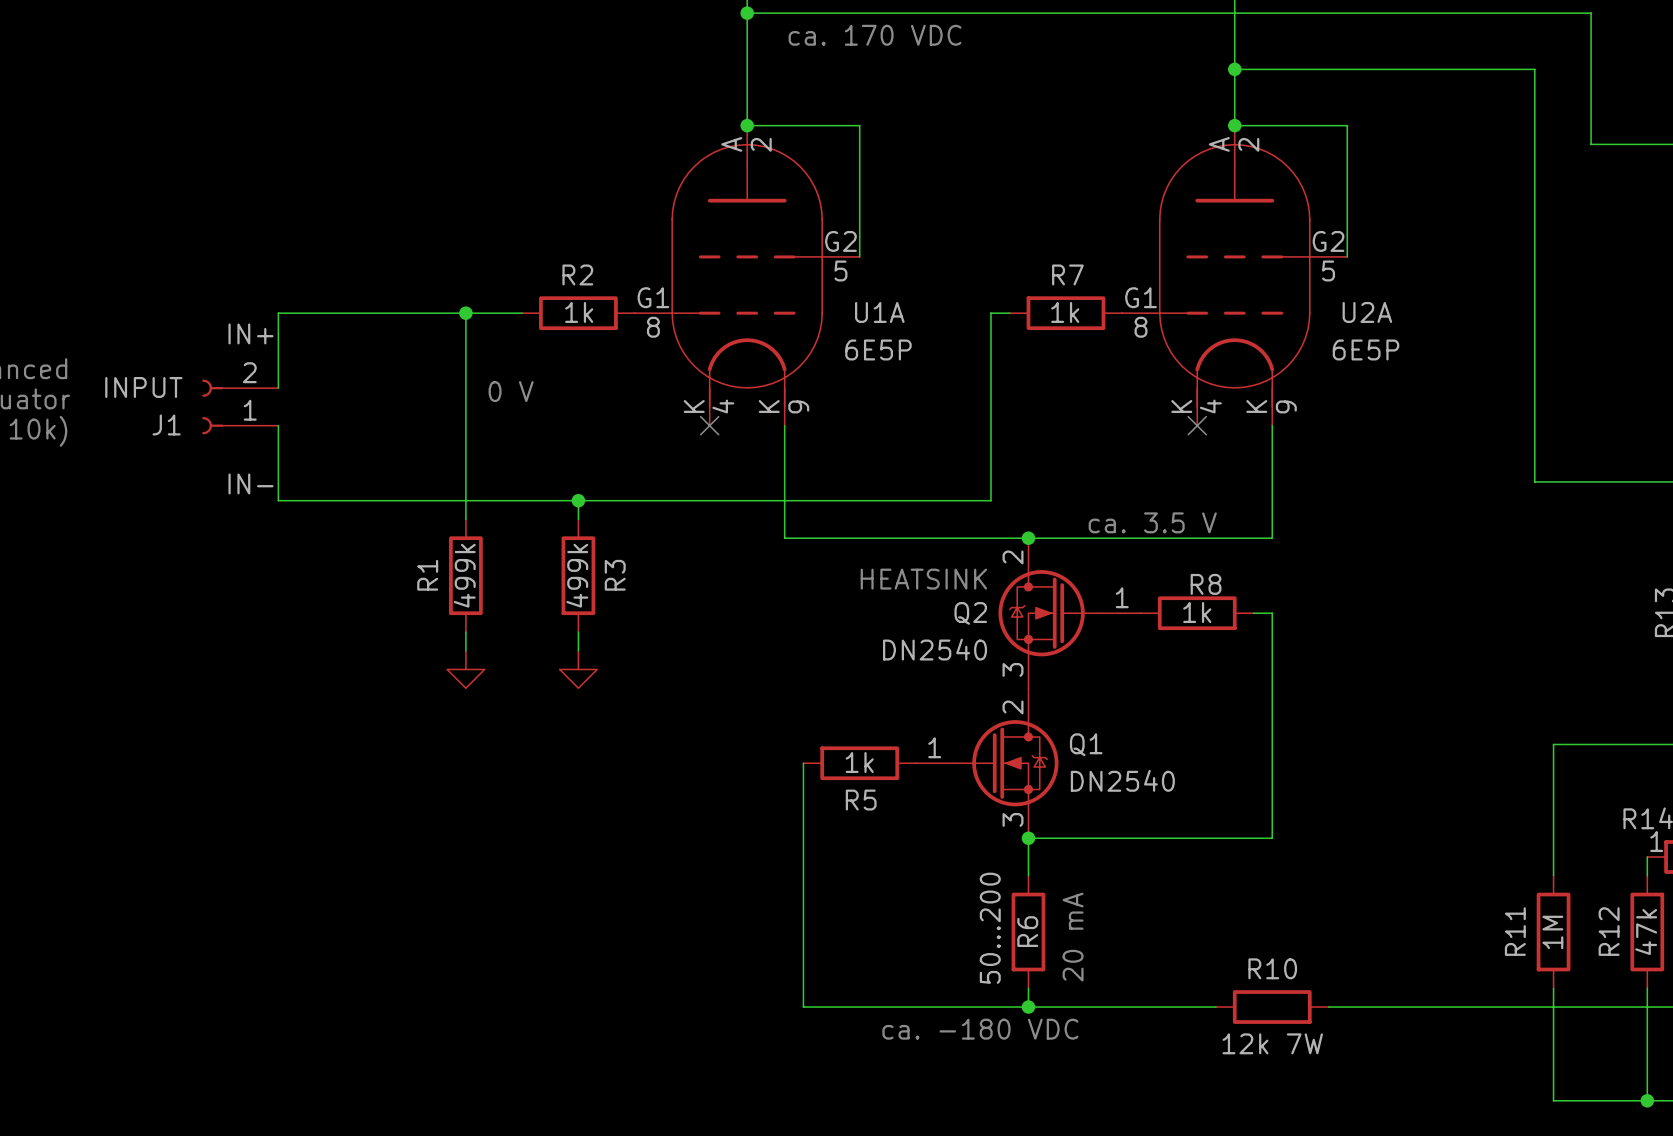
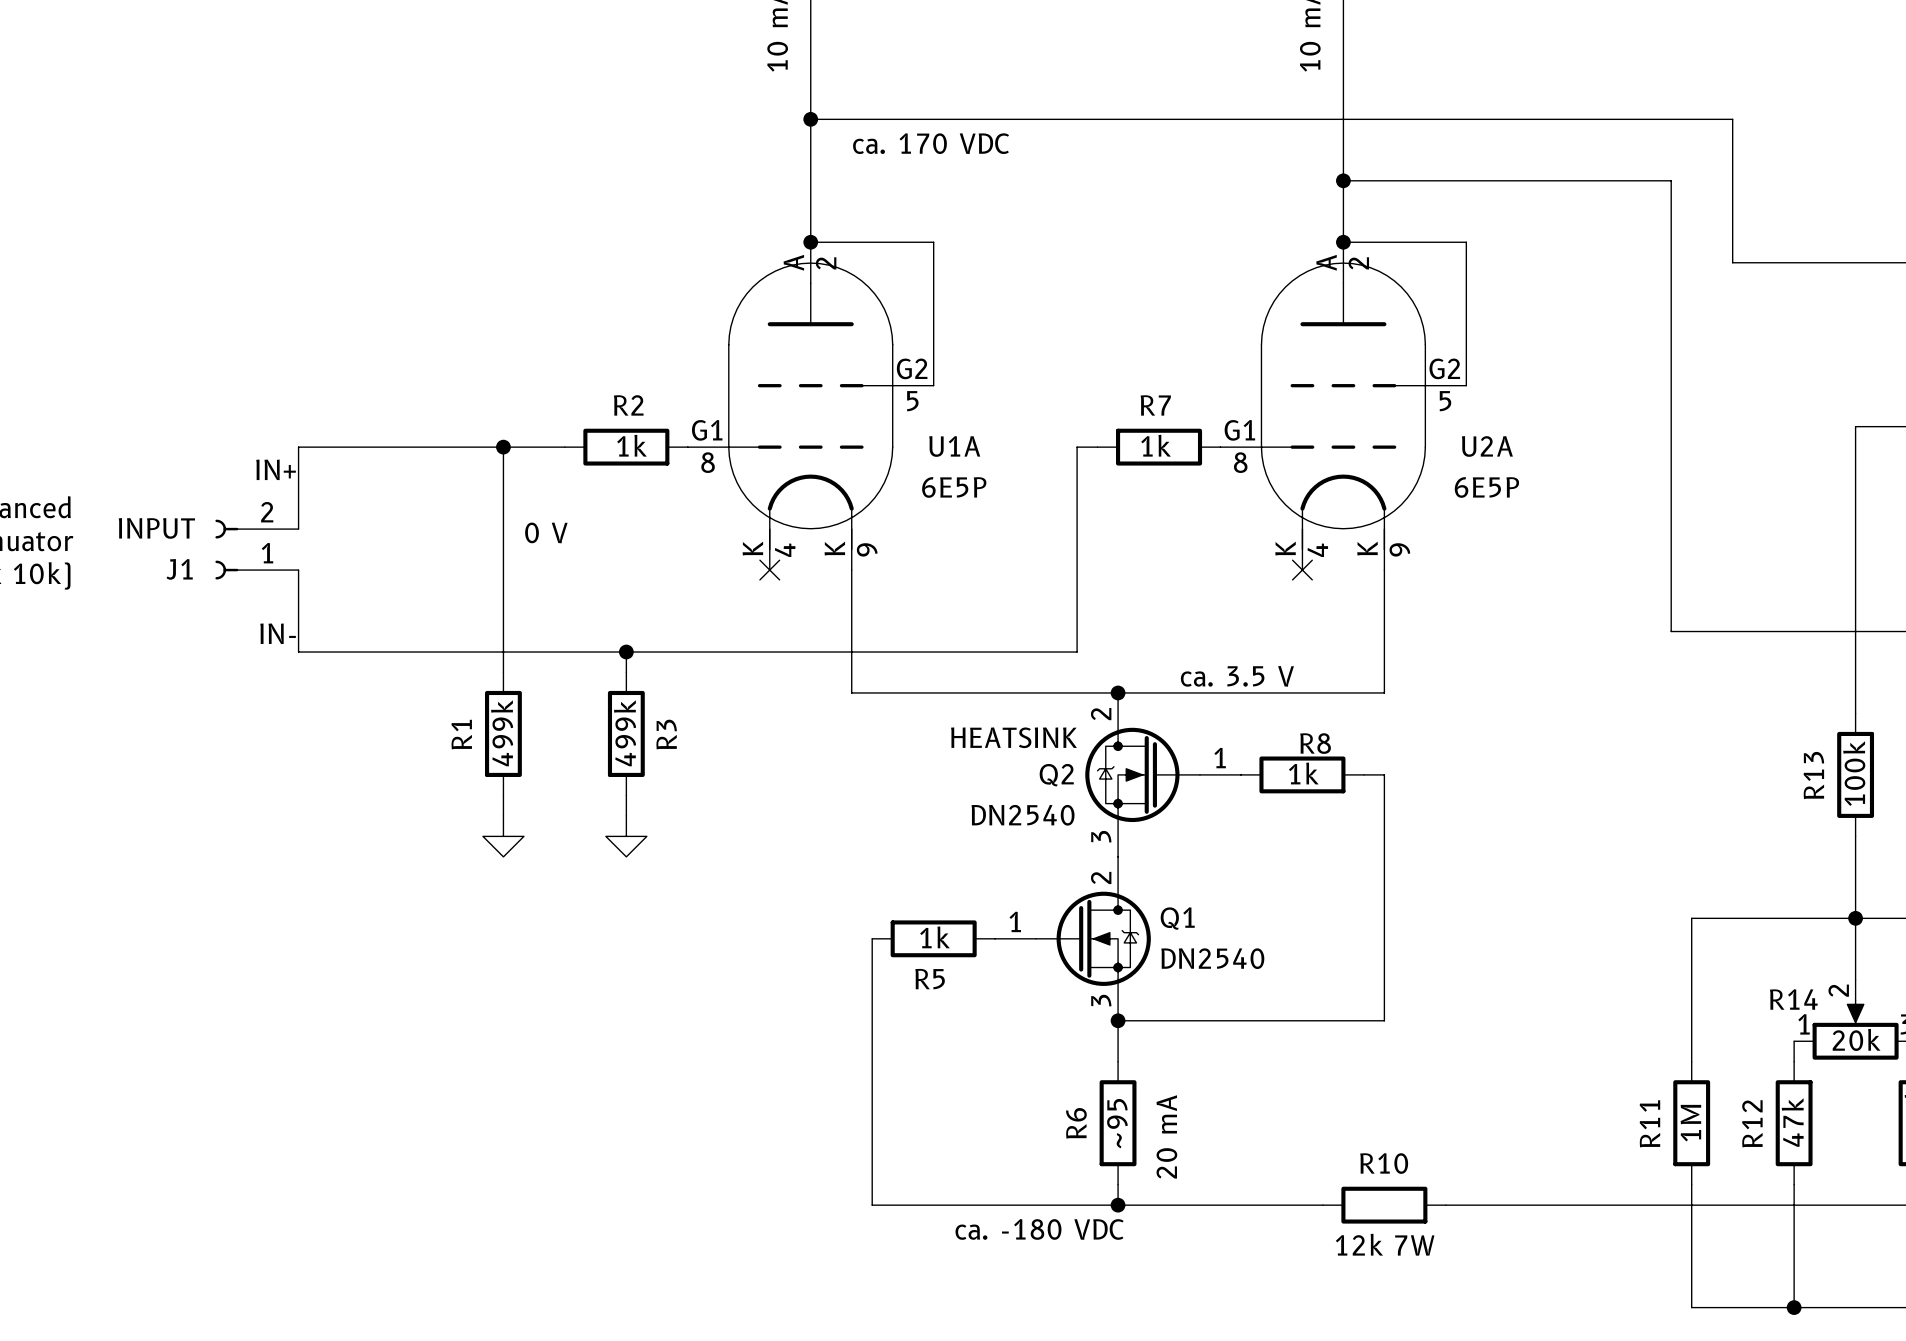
R6 value: 50...200 (990, 928) -> ~95 (1117, 1123)
R6 name position: R6 (1027, 931) -> R6 (1076, 1123)

